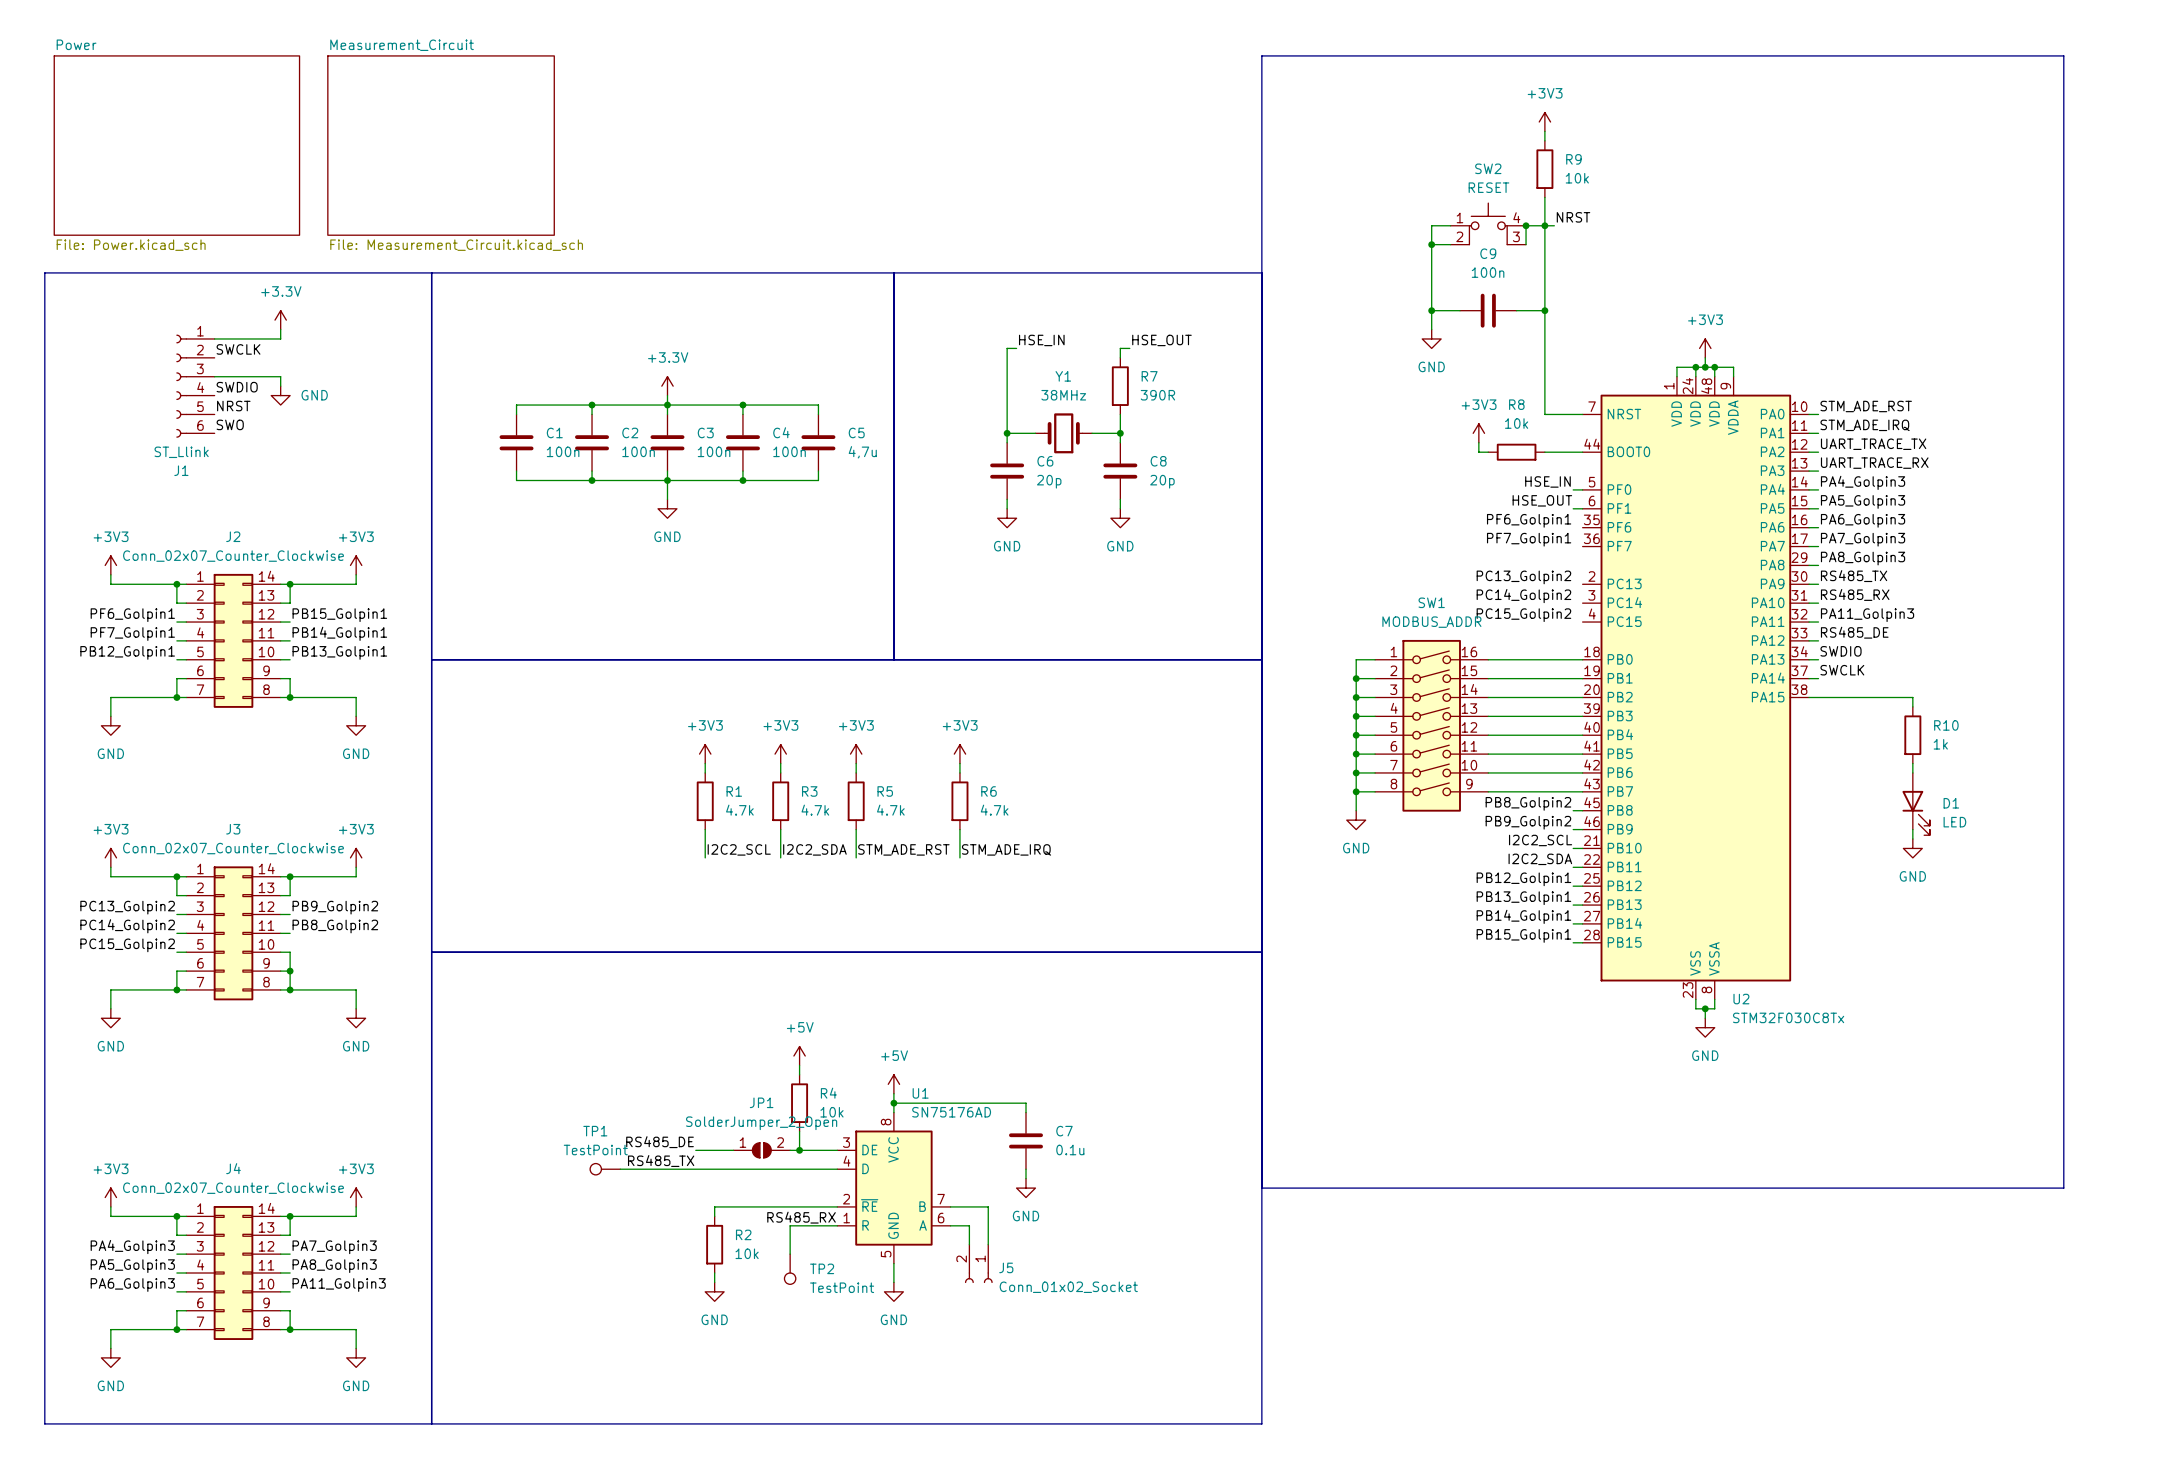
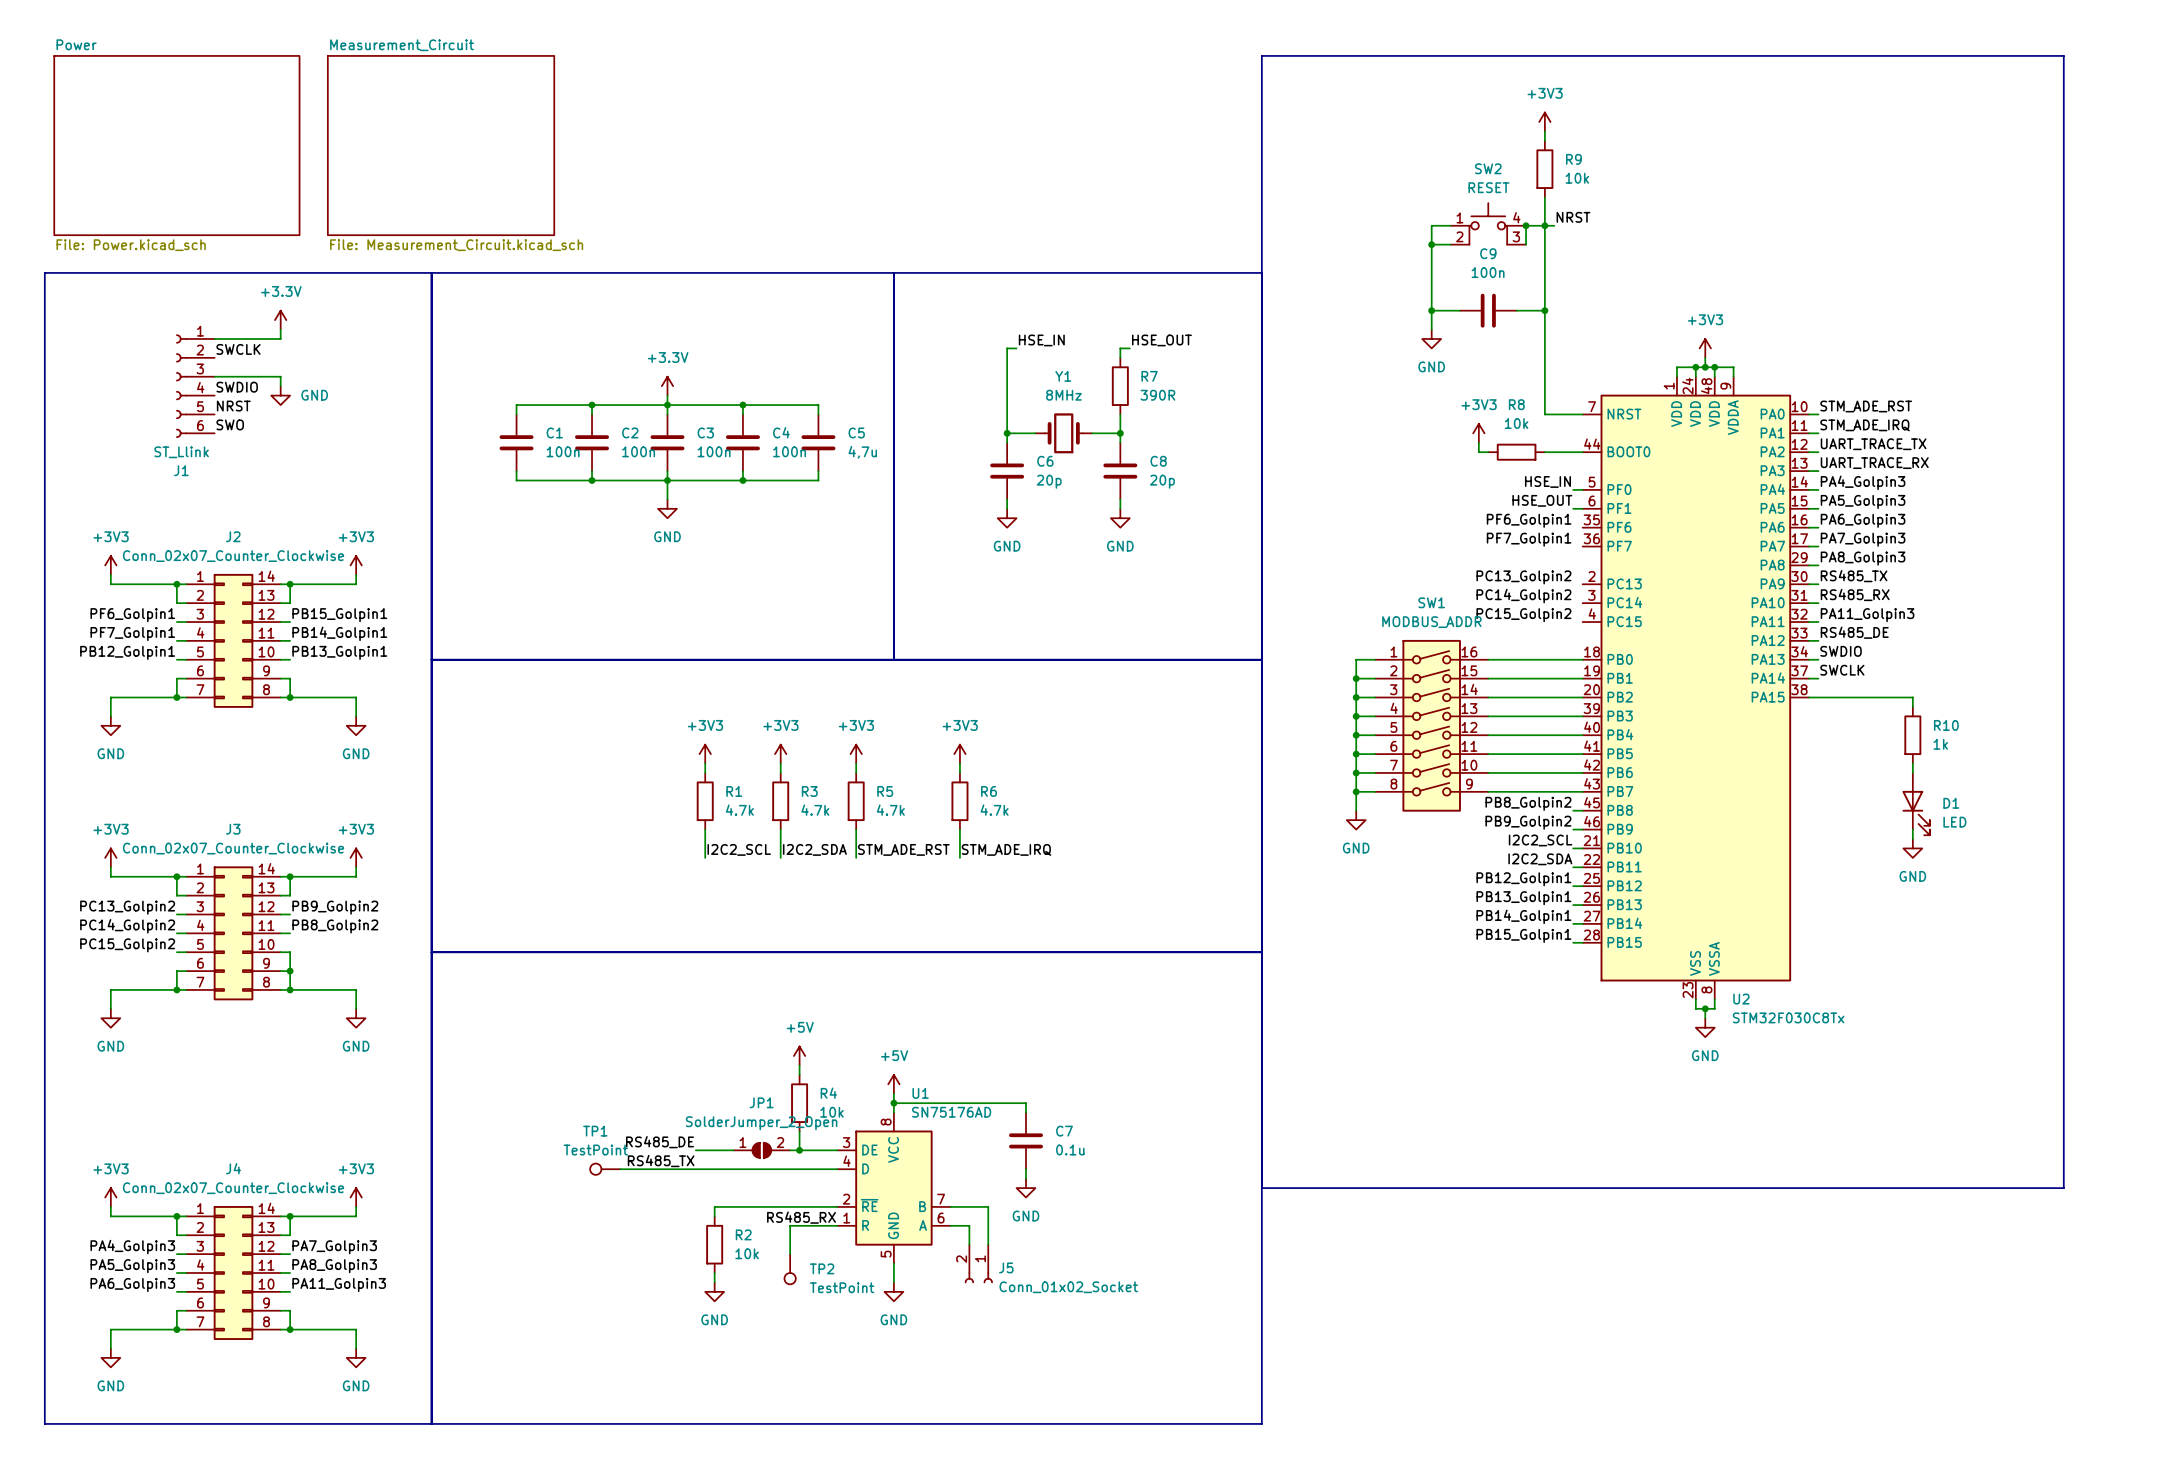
Y1 value: 38MHz (1063, 395) -> 8MHz (1063, 395)

